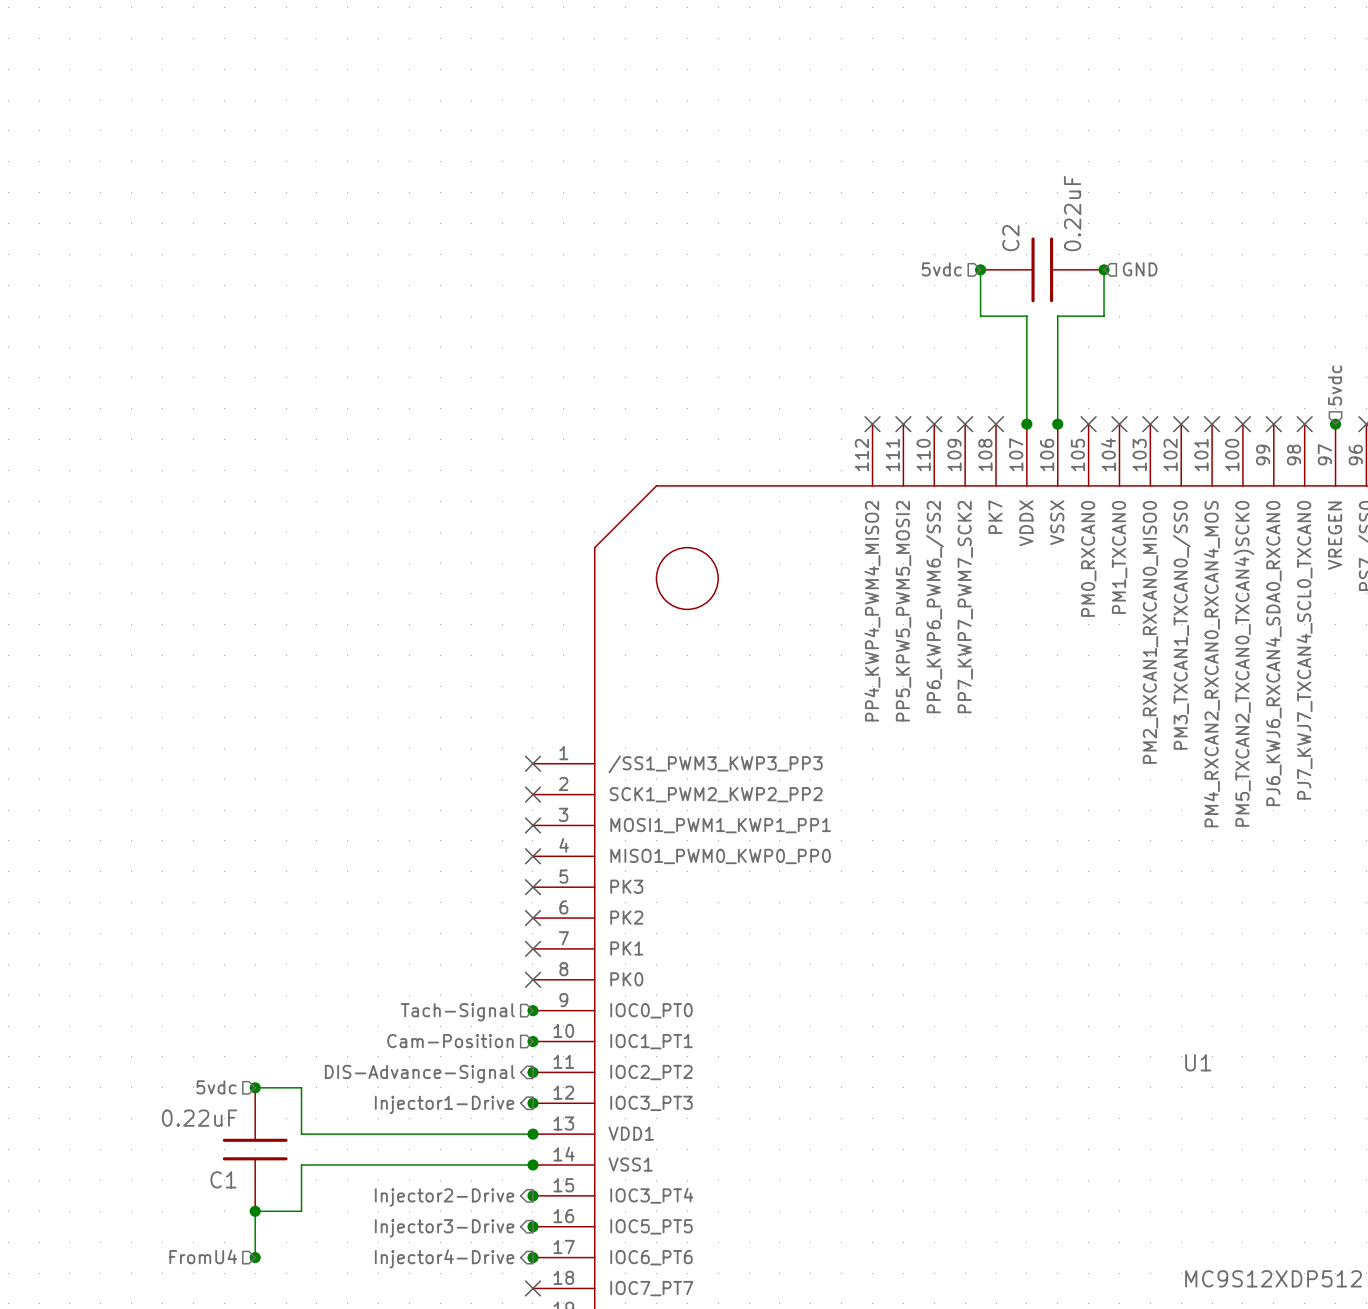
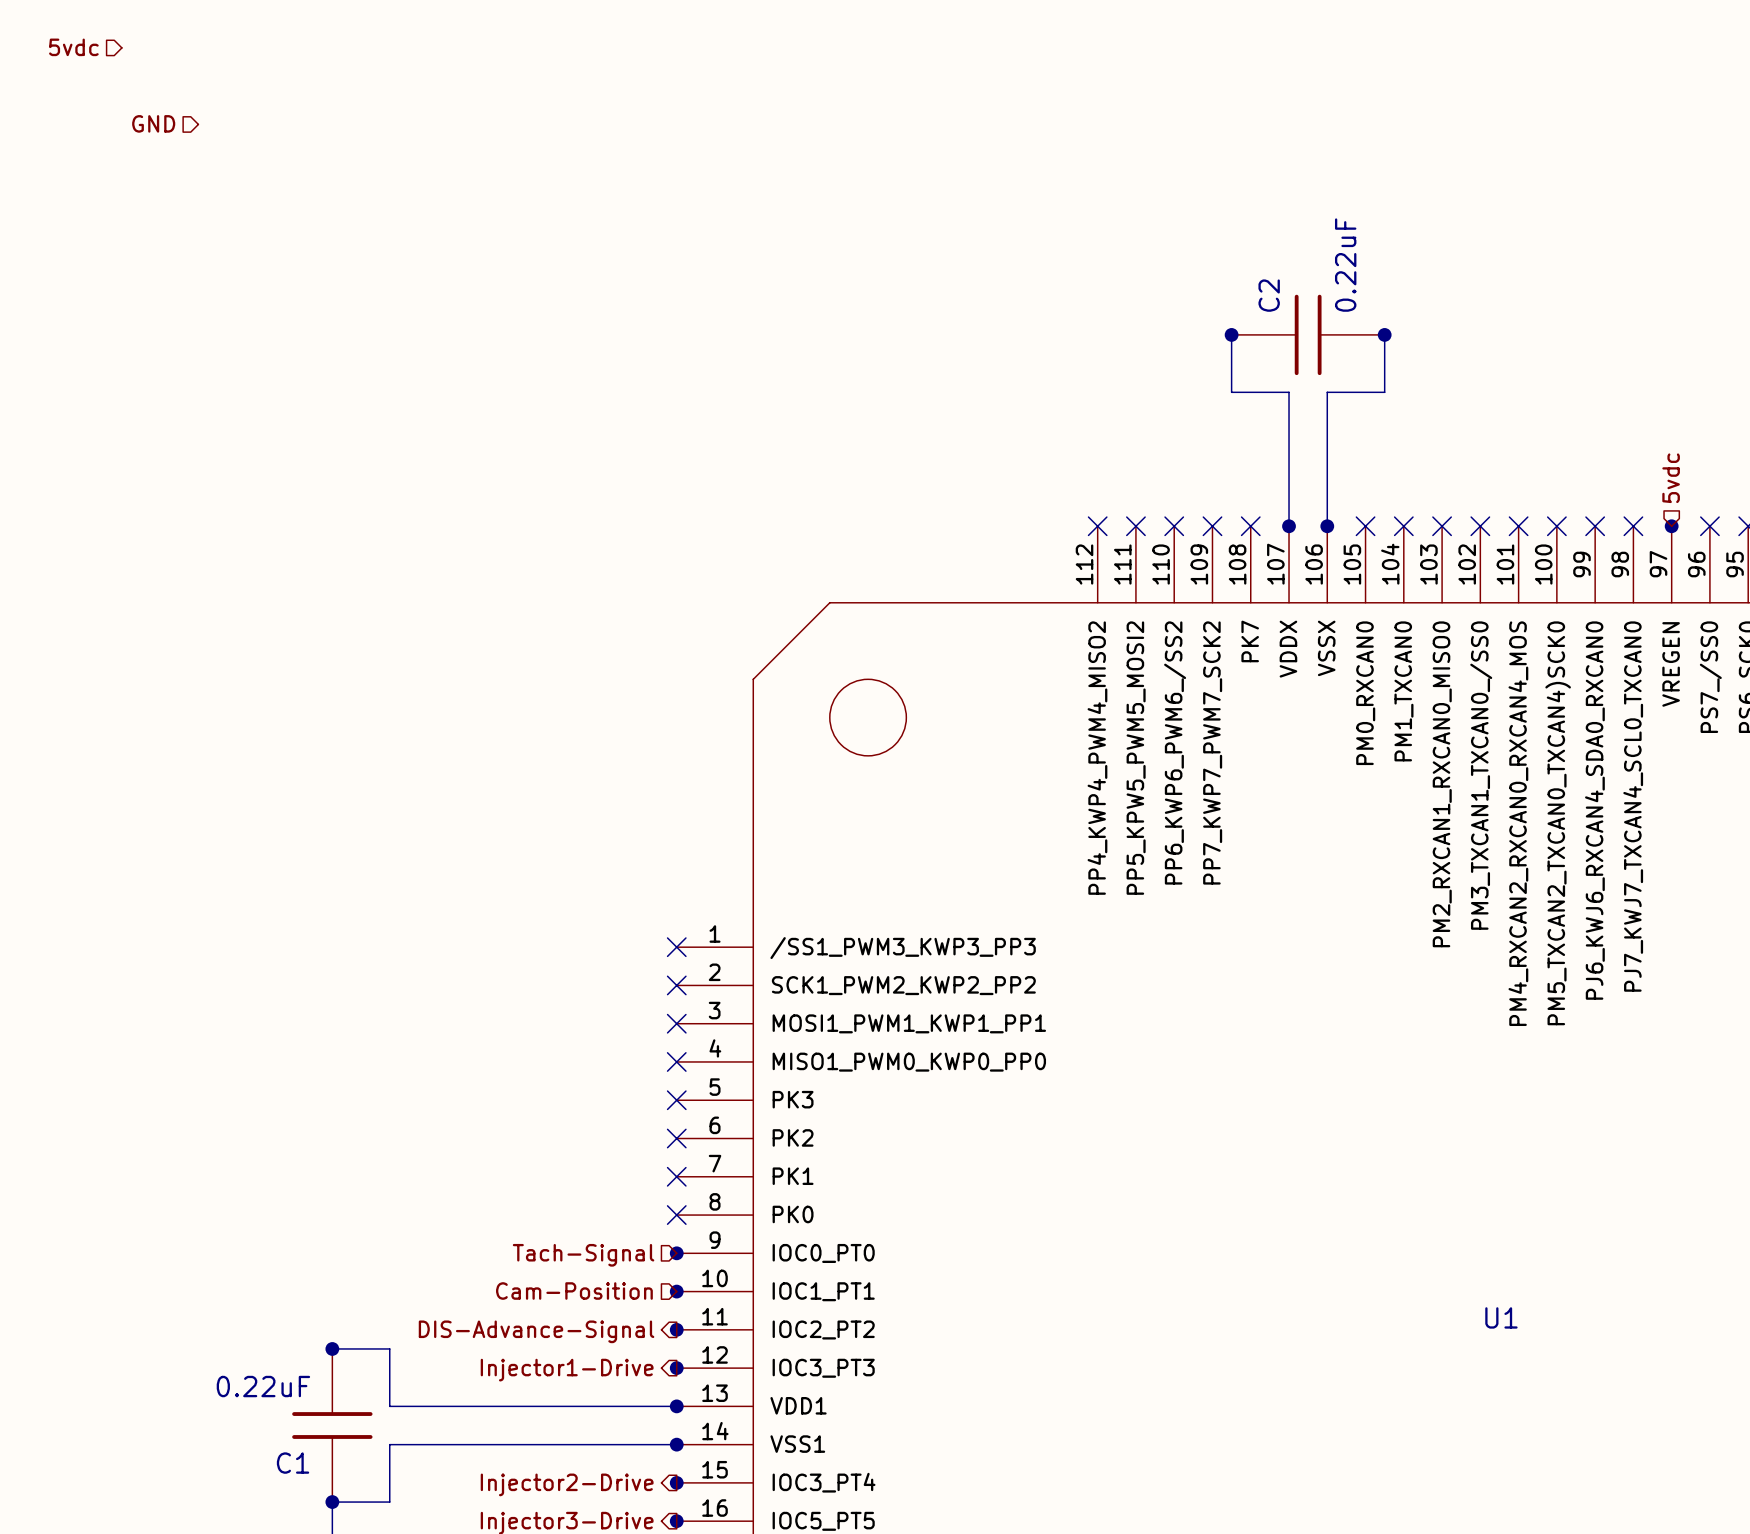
hierarchical label: none -> 5vdc (73, 47)
hierarchical label: none -> GND (153, 123)
hierarchical label: 5vdc (941, 269) -> none
hierarchical label: GND (1140, 269) -> none
hierarchical label: 5vdc (216, 1087) -> none

